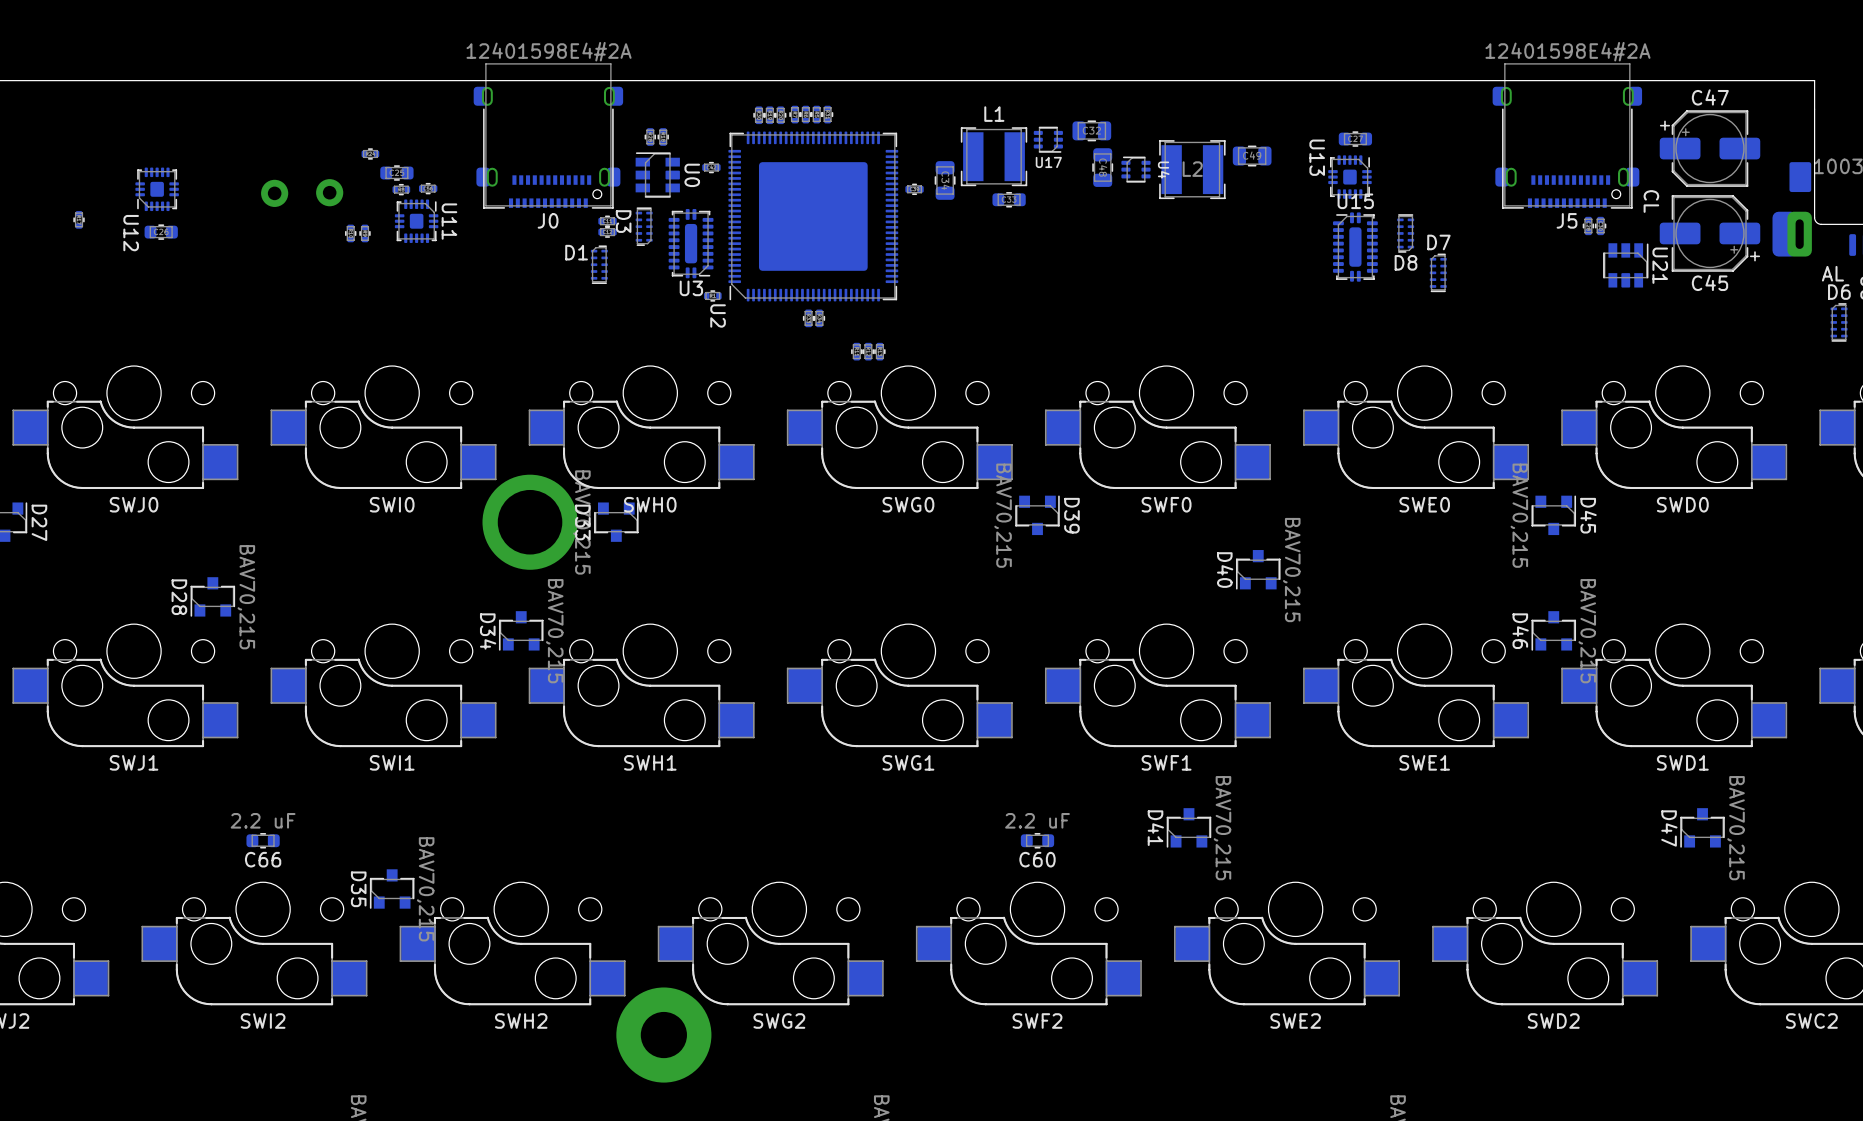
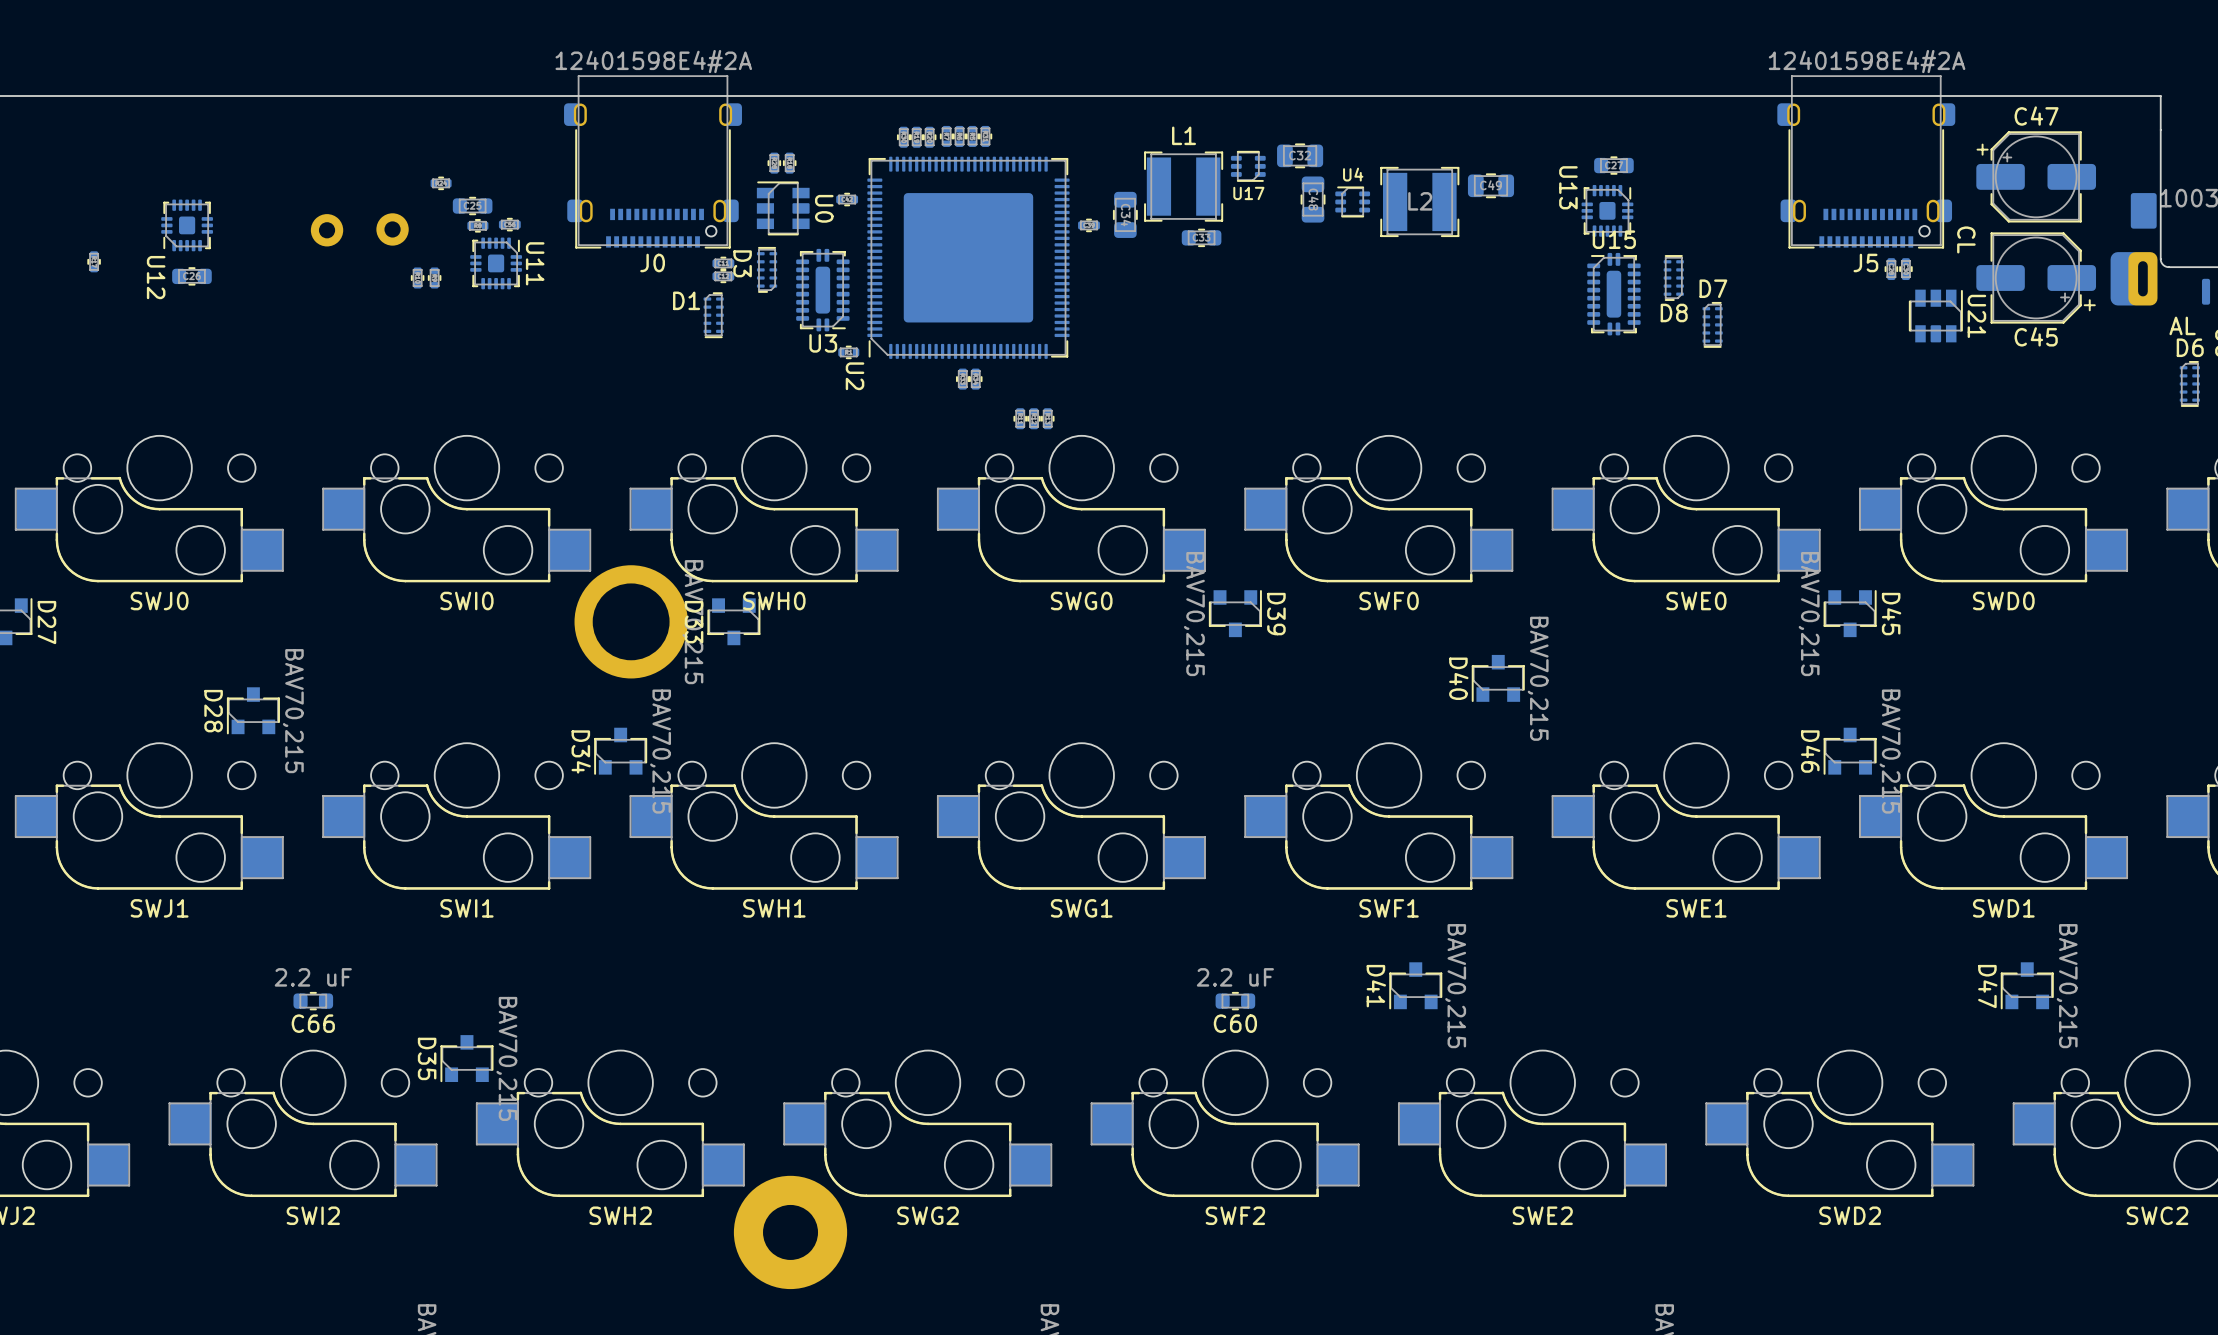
U4 name rotation: 0° (1163, 170) -> 90° counterclockwise (1353, 174)
U4 name position: U4 (1163, 170) -> U4 (1353, 174)

